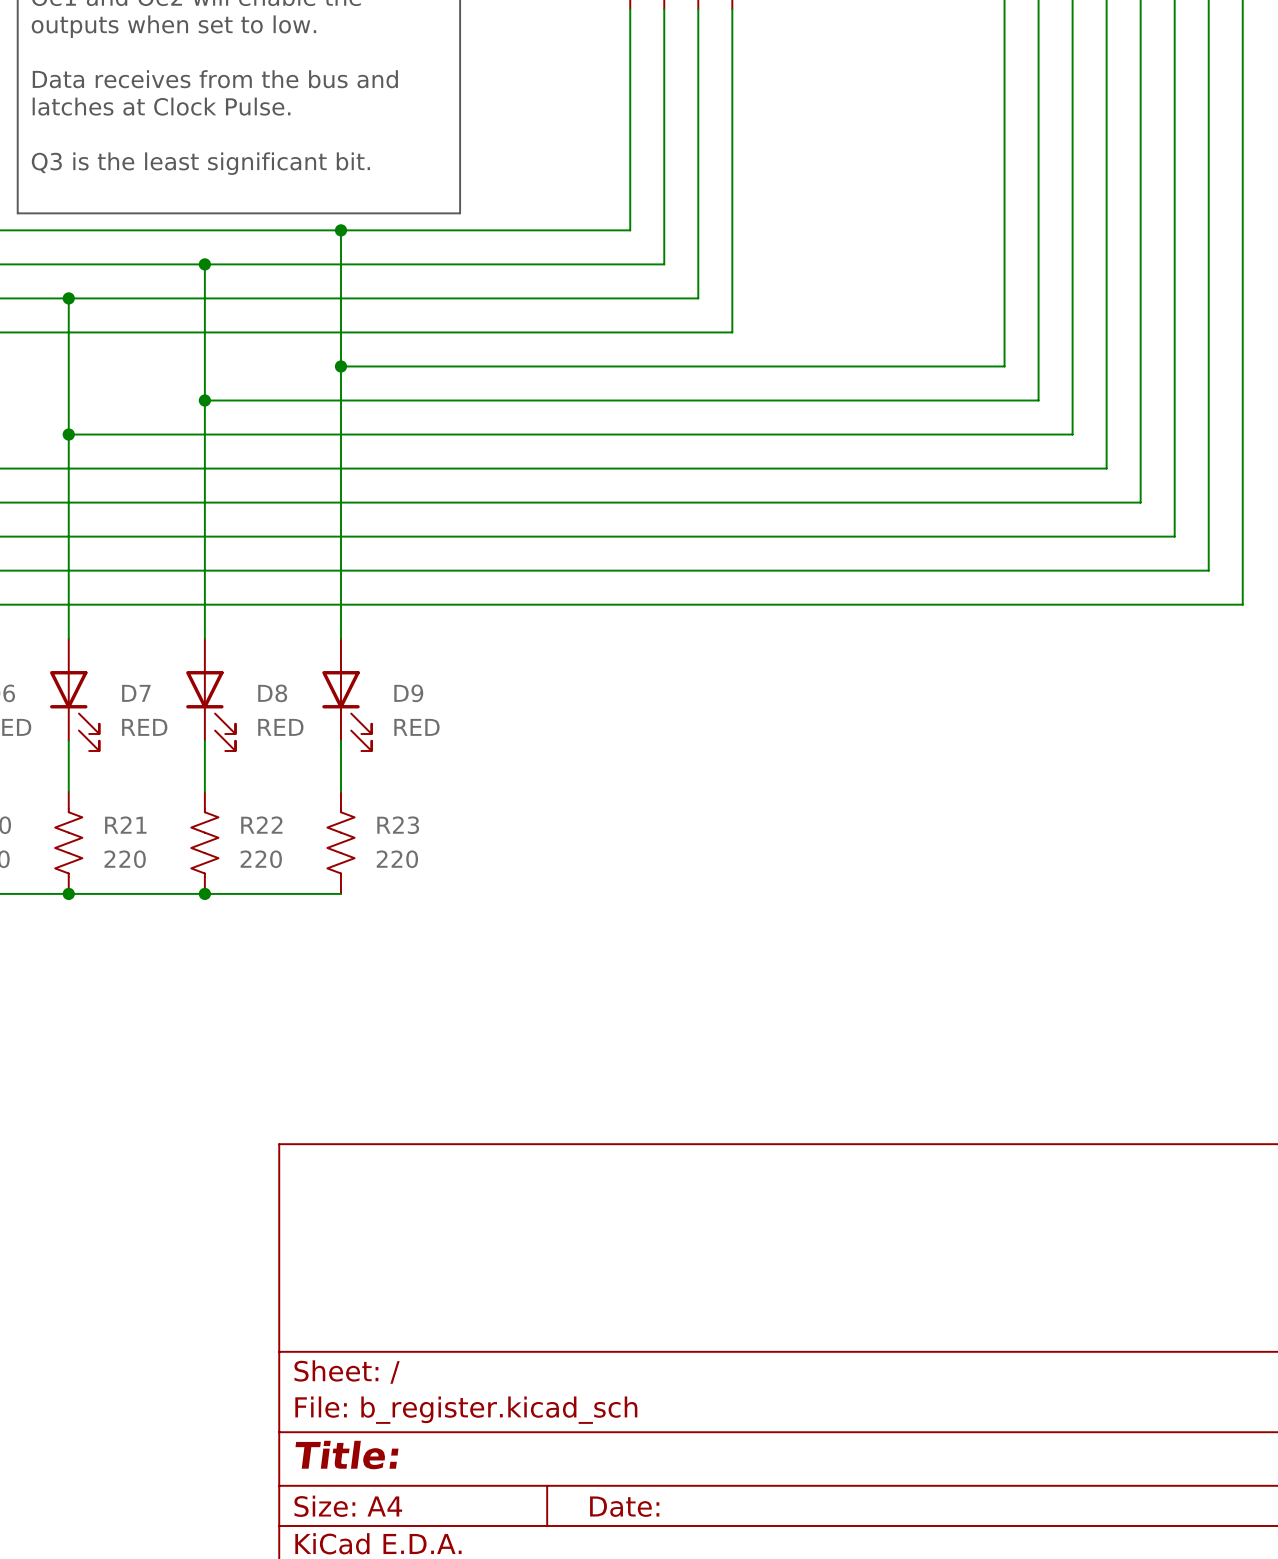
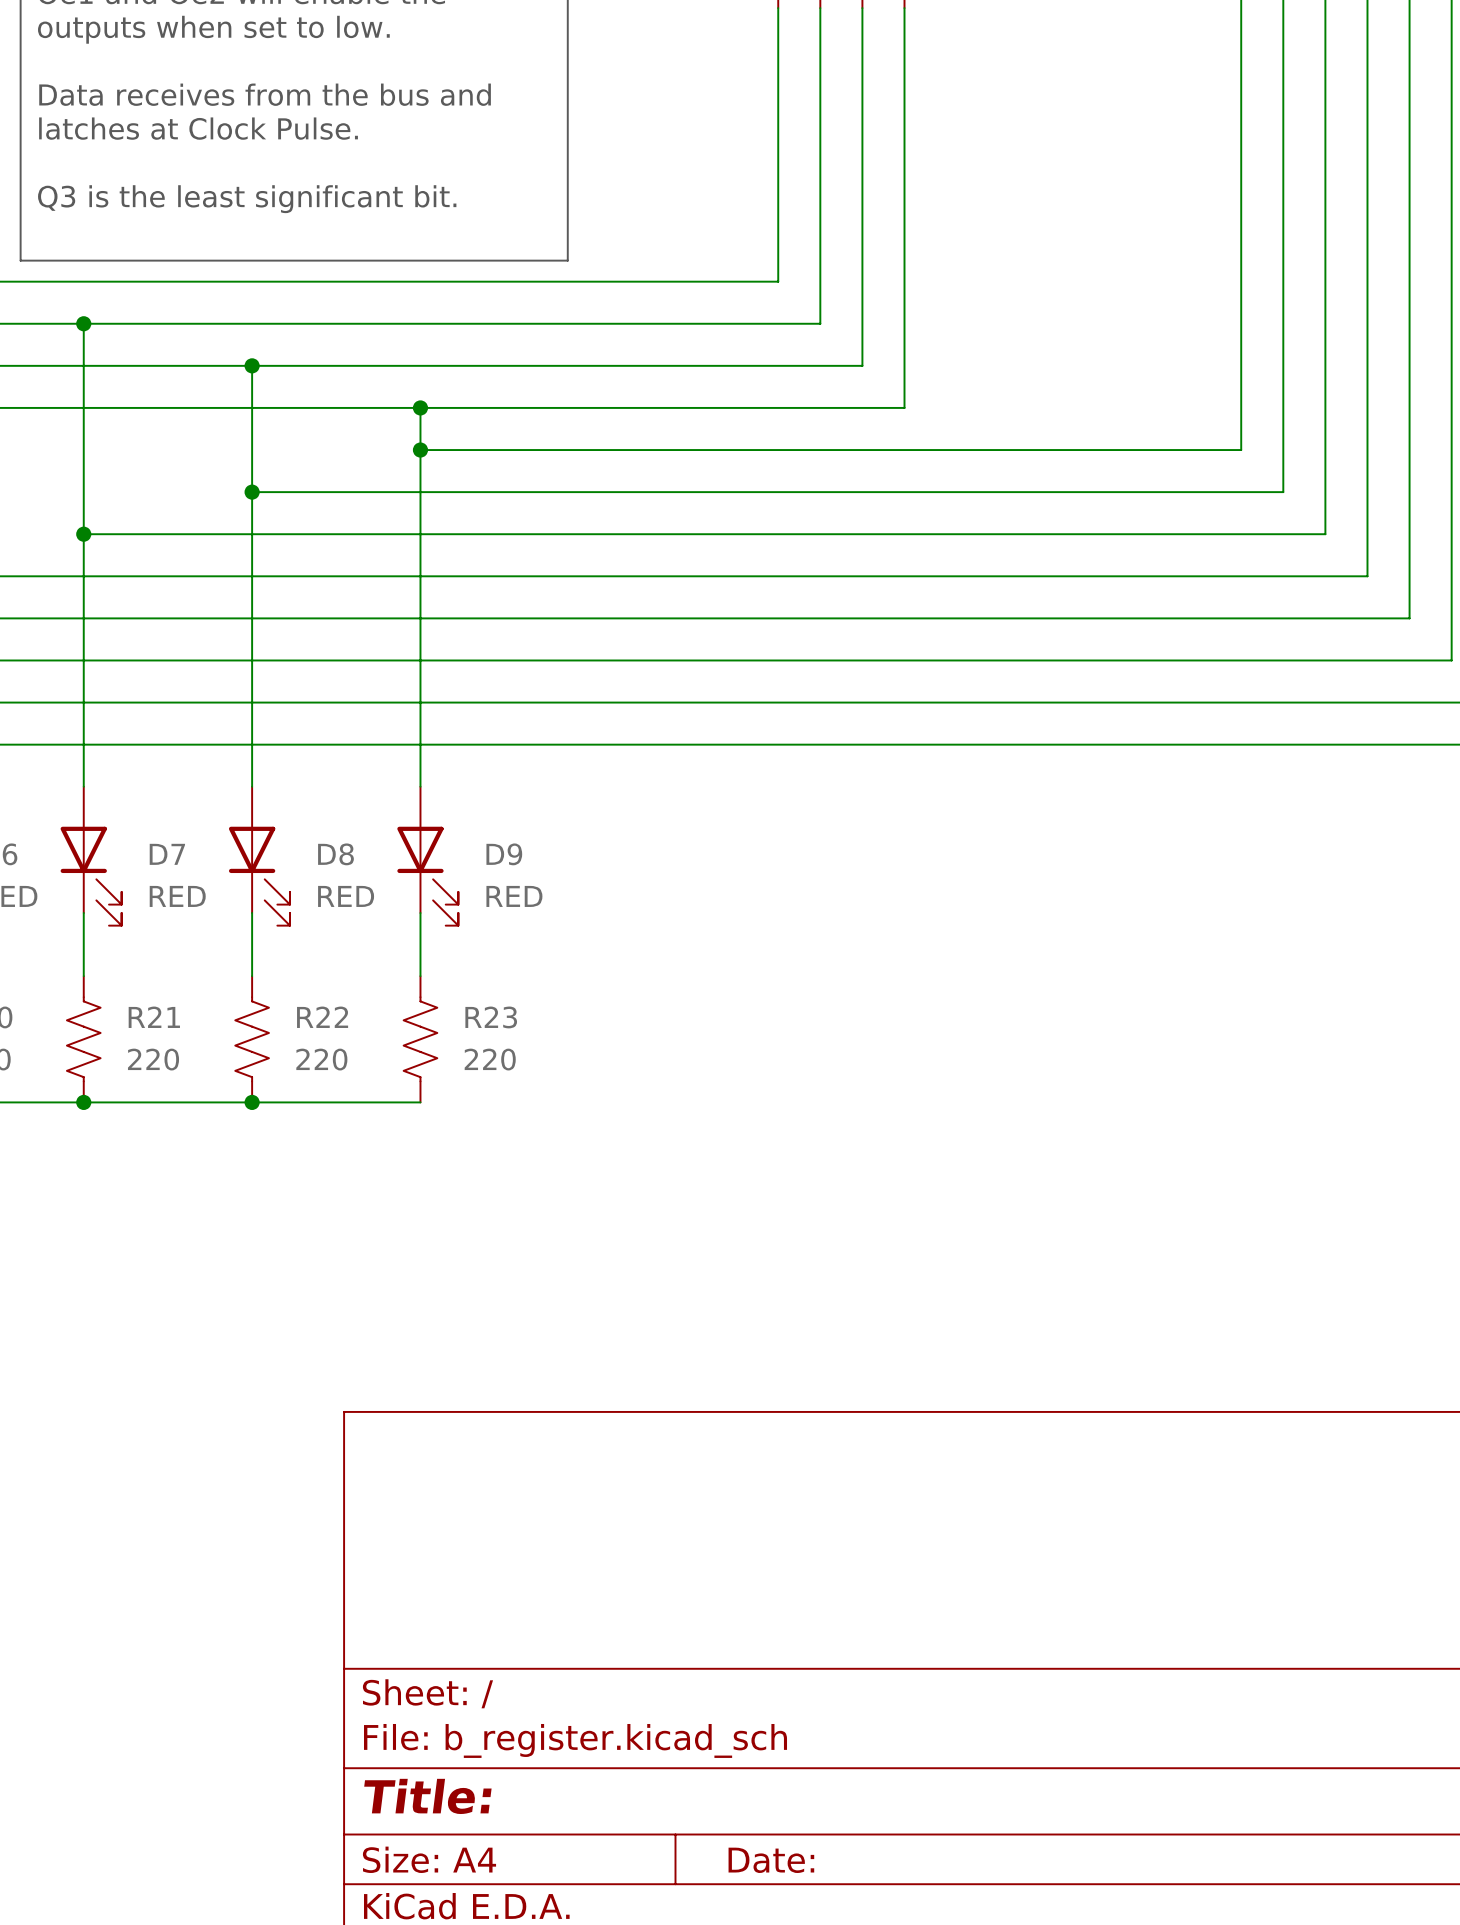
wire: (340, 230) (340, 332) -> none
junction: (340, 230) -> none
wire: (204, 264) (204, 298) -> (83, 323) (83, 365)
junction position: (204, 264) -> (252, 365)
junction position: (68, 298) -> (83, 323)
junction: none -> (420, 407)

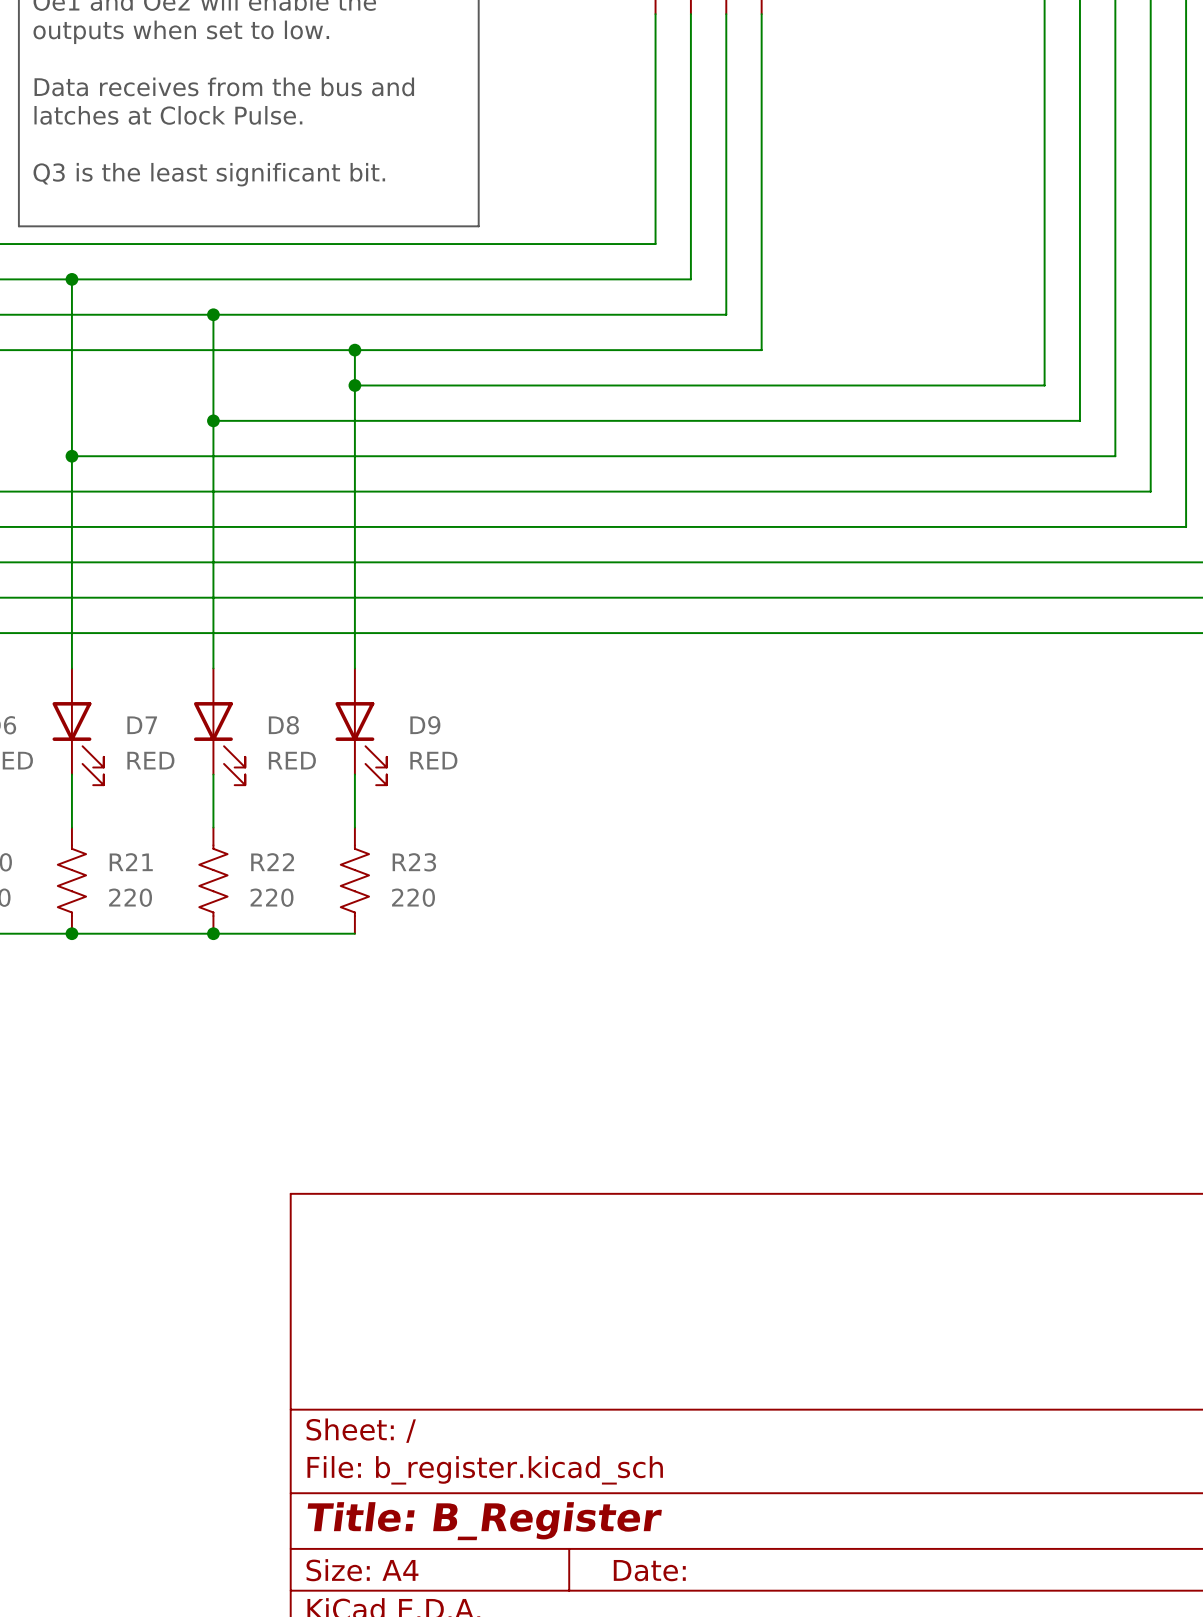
title block: Title: (427, 1796) -> Title: B_Register (484, 1521)

